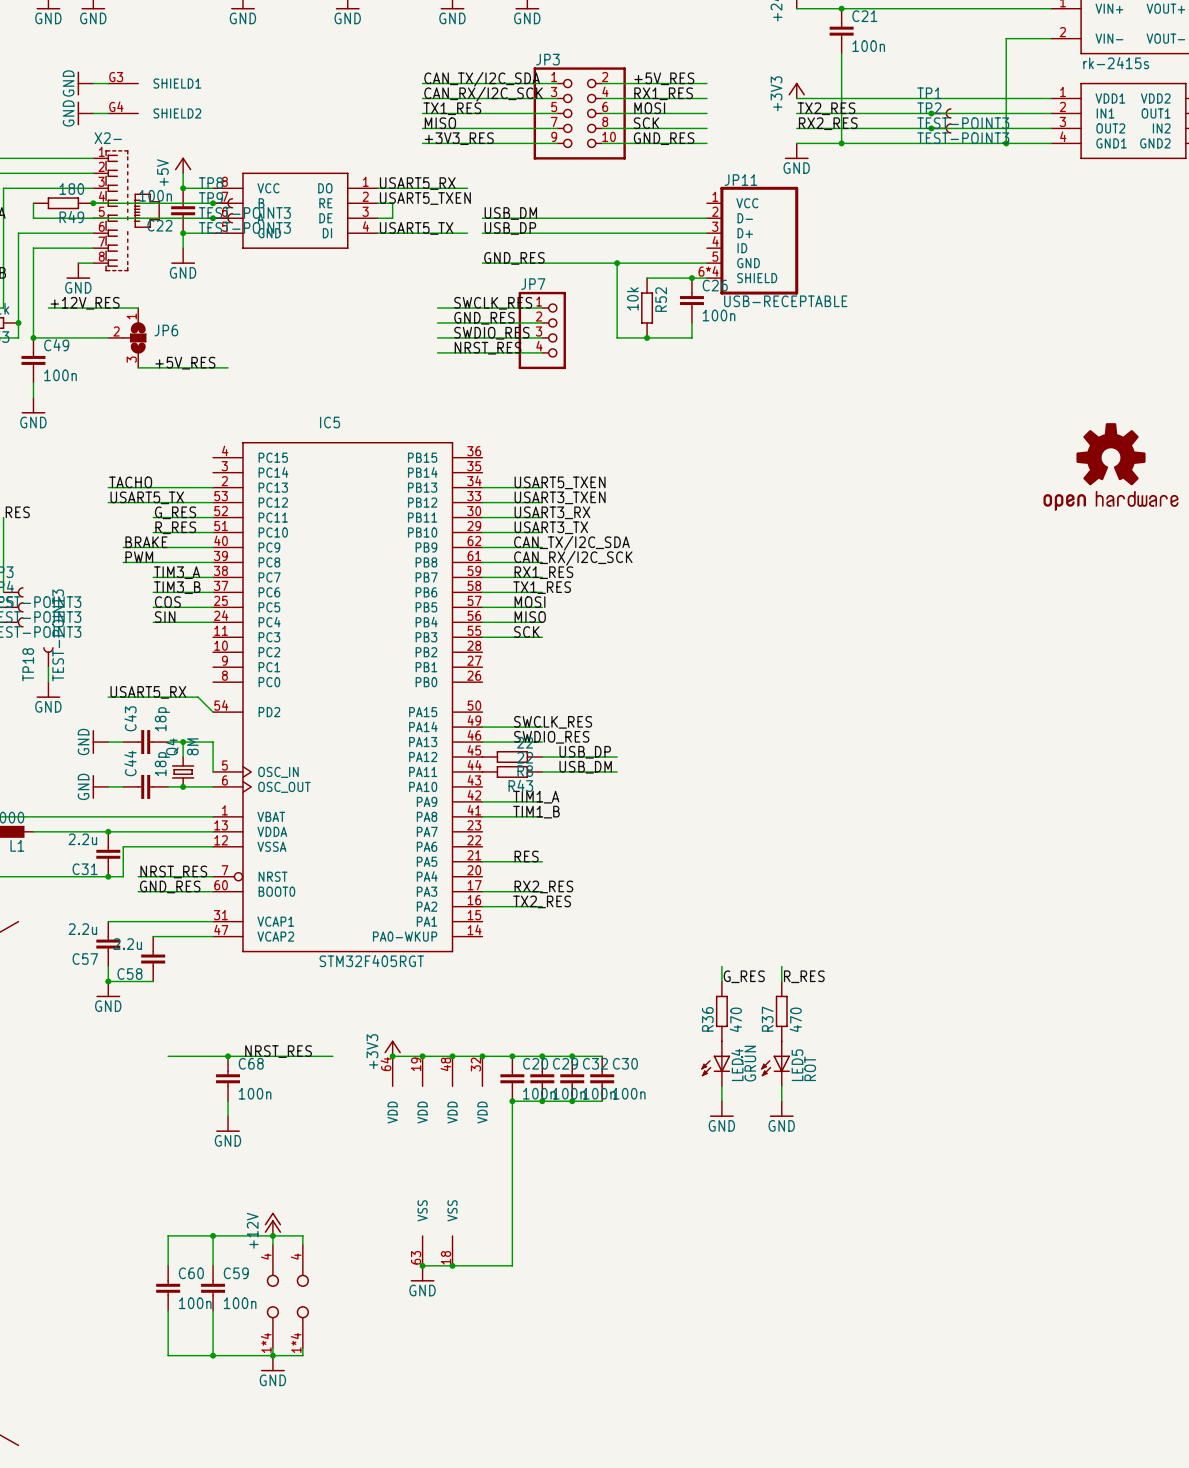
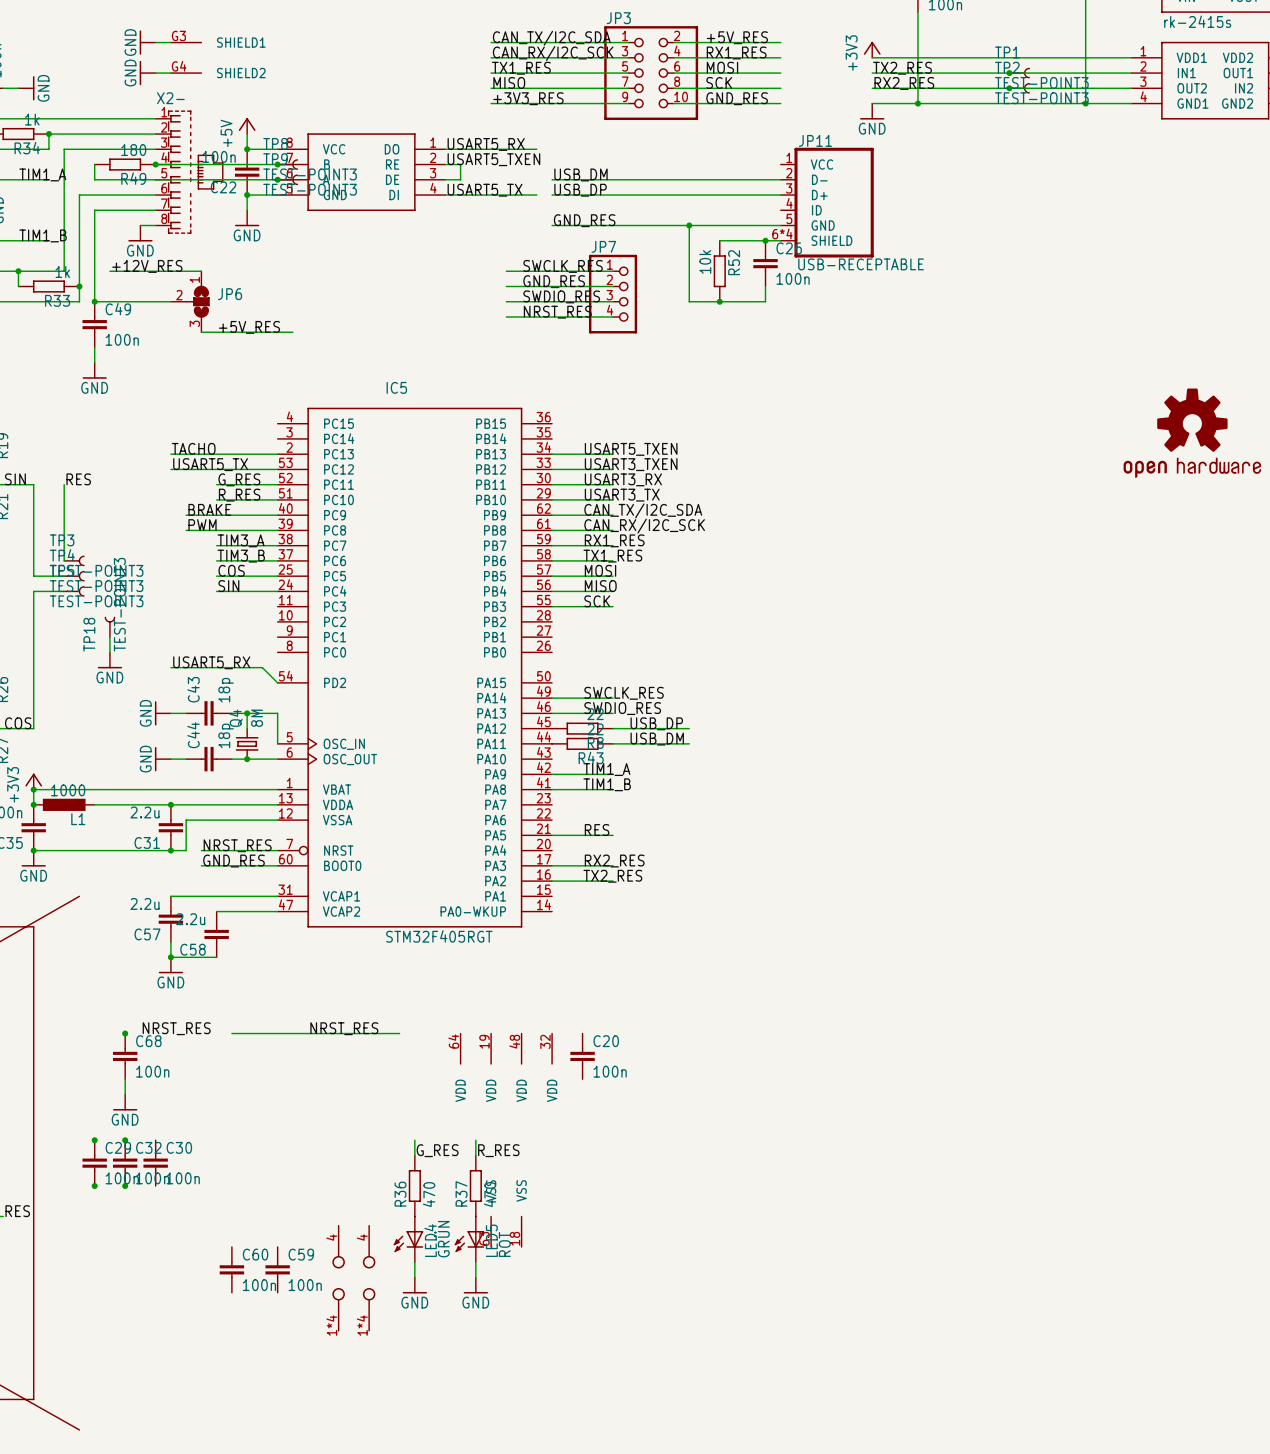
wire: (721, 966) (721, 981) -> none
wire: (781, 966) (781, 981) -> none
label: G_RES (744, 976) -> none
label: R_RES (804, 976) -> none
R36 position: (721, 1011) -> (414, 1186)
R37 position: (781, 1011) -> (475, 1186)
power symbol: +3V3 (392, 1048) -> none
label: none -> NRST_RES (176, 1028)
junction: none -> (125, 1033)
junction: (228, 1056) -> none
wire: (392, 1056) (602, 1056) -> none
junction: (392, 1056) -> none
junction: (422, 1056) -> none
junction: (452, 1056) -> none
junction: (482, 1056) -> none
junction: (512, 1056) -> none
junction: (542, 1056) -> none
junction: (572, 1056) -> none
LED4 position: (715, 1063) -> (408, 1239)
LED5 position: (775, 1063) -> (469, 1239)
C68 position: (228, 1078) -> (125, 1056)
C29 position: (542, 1078) -> (94, 1163)
C32 position: (572, 1078) -> (125, 1163)
C30 position: (602, 1078) -> (155, 1163)
wire: (721, 1086) (721, 1101) -> none
wire: (781, 1086) (781, 1101) -> none
wire: none -> (125, 1079) (125, 1094)
wire: (228, 1101) (228, 1116) -> (414, 1140) (414, 1155)
junction: (512, 1101) -> none
junction: (542, 1101) -> none
junction: (572, 1101) -> none
wire: (602, 1101) (512, 1101) (512, 1265) (422, 1265) -> none
power symbol: GND (721, 1109) -> none
power symbol: GND (781, 1109) -> none
power symbol: none -> GND (125, 1102)
power symbol: GND (228, 1124) -> none
junction: none -> (94, 1140)
junction: none -> (125, 1140)
wire: none -> (475, 1140) (475, 1155)
label: none -> G_RES (437, 1150)
label: none -> R_RES (498, 1150)
junction: none -> (94, 1186)
junction: none -> (125, 1186)
power symbol: +12V (272, 1224) -> none
wire: (213, 1235) (213, 1265) -> none
junction: (213, 1235) -> none
wire: (272, 1235) (272, 1244) -> none
junction: (272, 1235) -> none
wire: (302, 1244) (302, 1235) (168, 1235) (168, 1265) -> none
junction: (422, 1265) -> none
junction: (452, 1265) -> none
power symbol position: GND (422, 1273) -> GND (475, 1285)
wire: none -> (414, 1262) (414, 1277)
wire: none -> (475, 1262) (475, 1277)
power symbol: none -> GND (414, 1285)
wire: (168, 1310) (168, 1355) (302, 1355) (302, 1348) -> none
wire: (213, 1310) (213, 1355) -> none
wire: (272, 1348) (272, 1355) -> none
junction: (213, 1355) -> none
junction: (272, 1355) -> none
power symbol: GND (272, 1363) -> none

